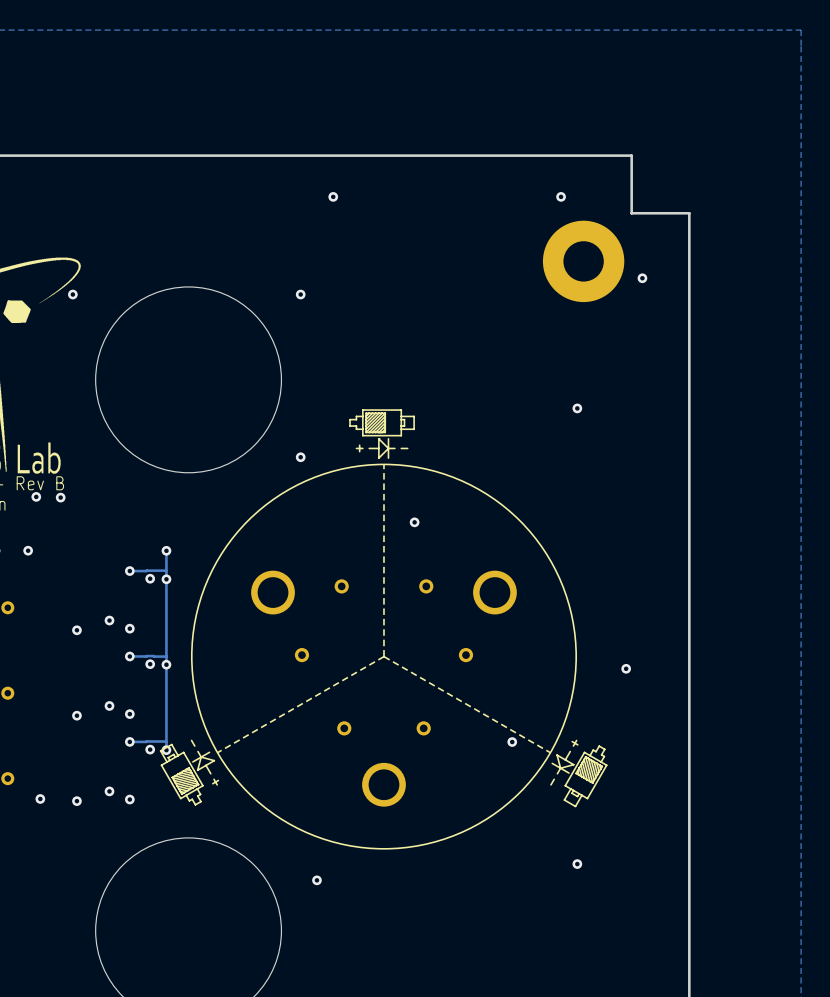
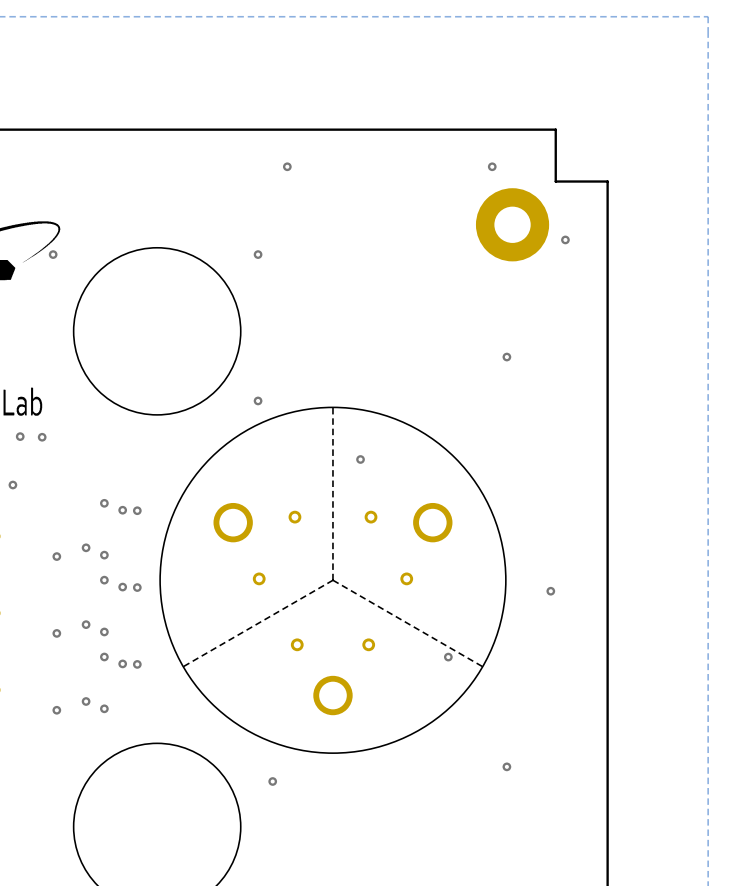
drawing: [349, 409, 415, 459] -> none
track: (166, 550) (166, 750) -> none
via: (166, 550) -> none
track: (129, 571) (166, 571) -> none
track: (129, 656) (166, 656) -> none
drawing: [159, 739, 220, 806] -> none
drawing: [550, 739, 608, 808] -> none
track: (129, 741) (166, 742) -> none
via: (40, 798) -> none

